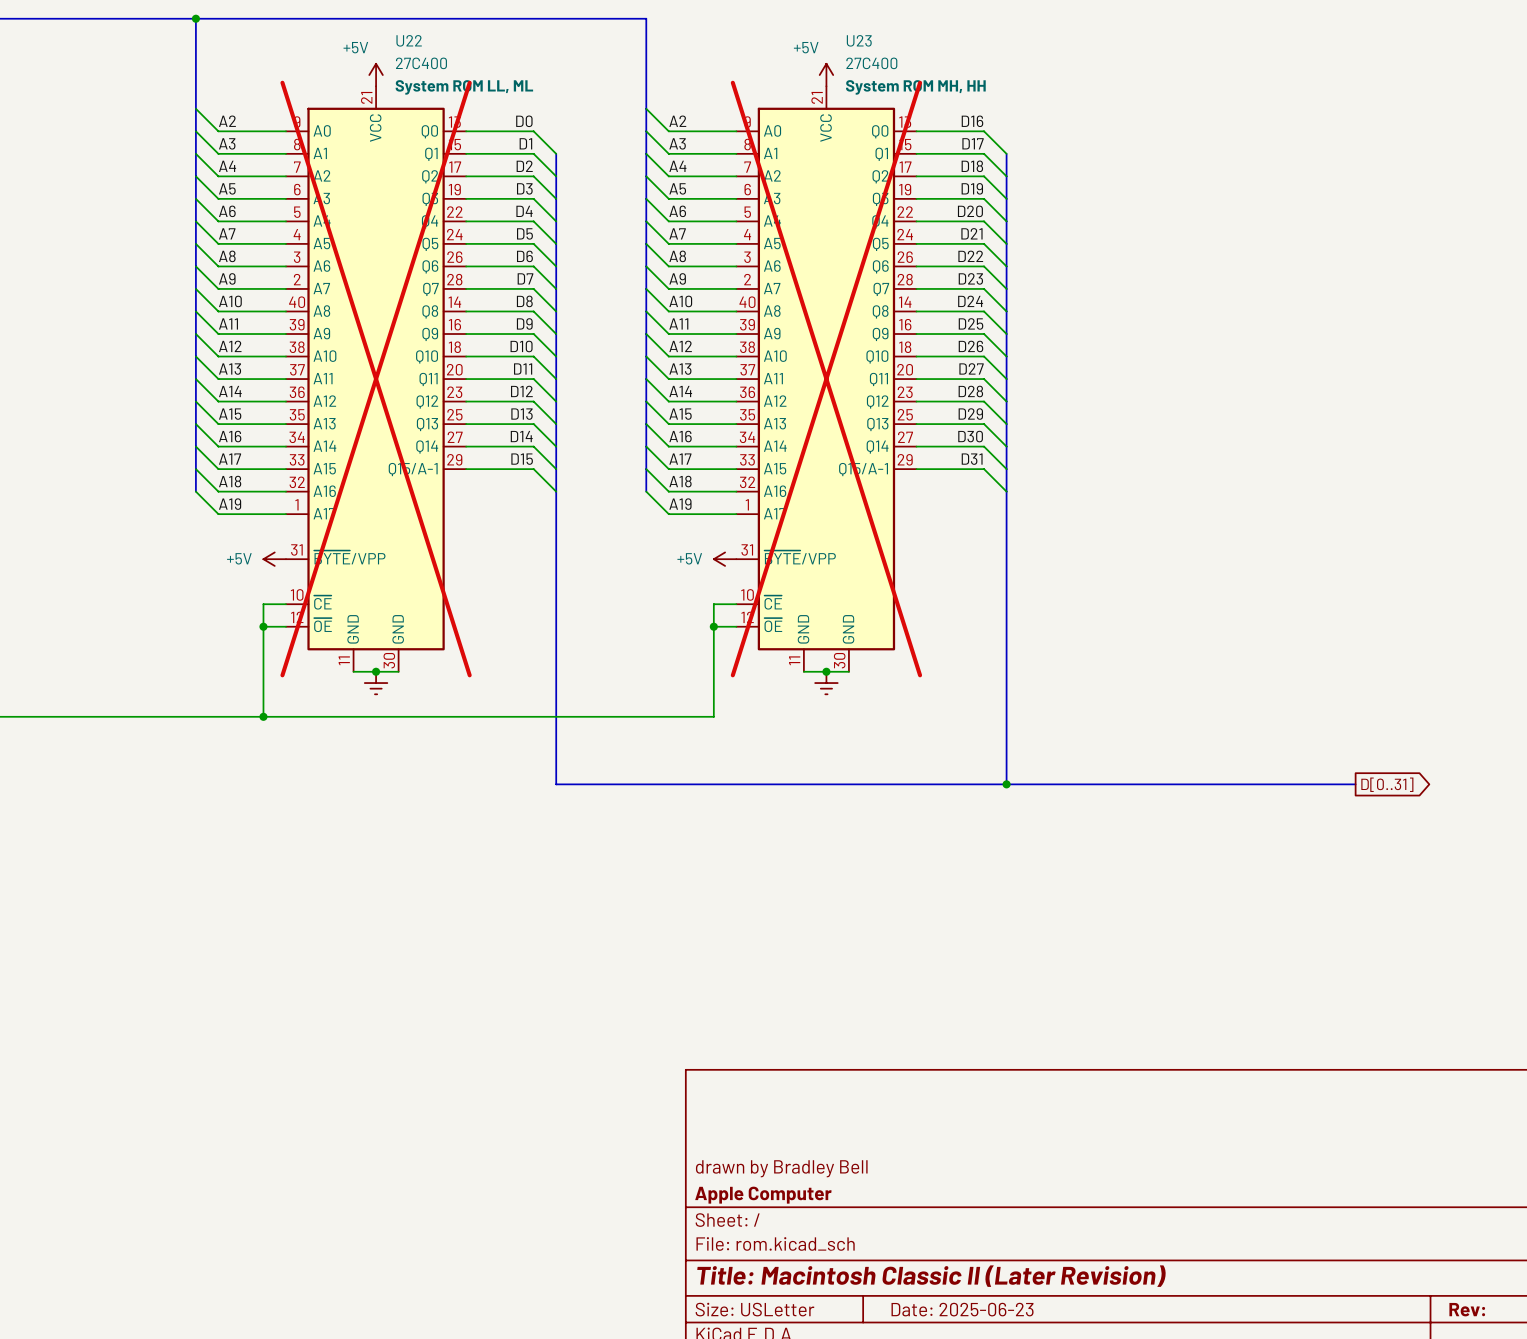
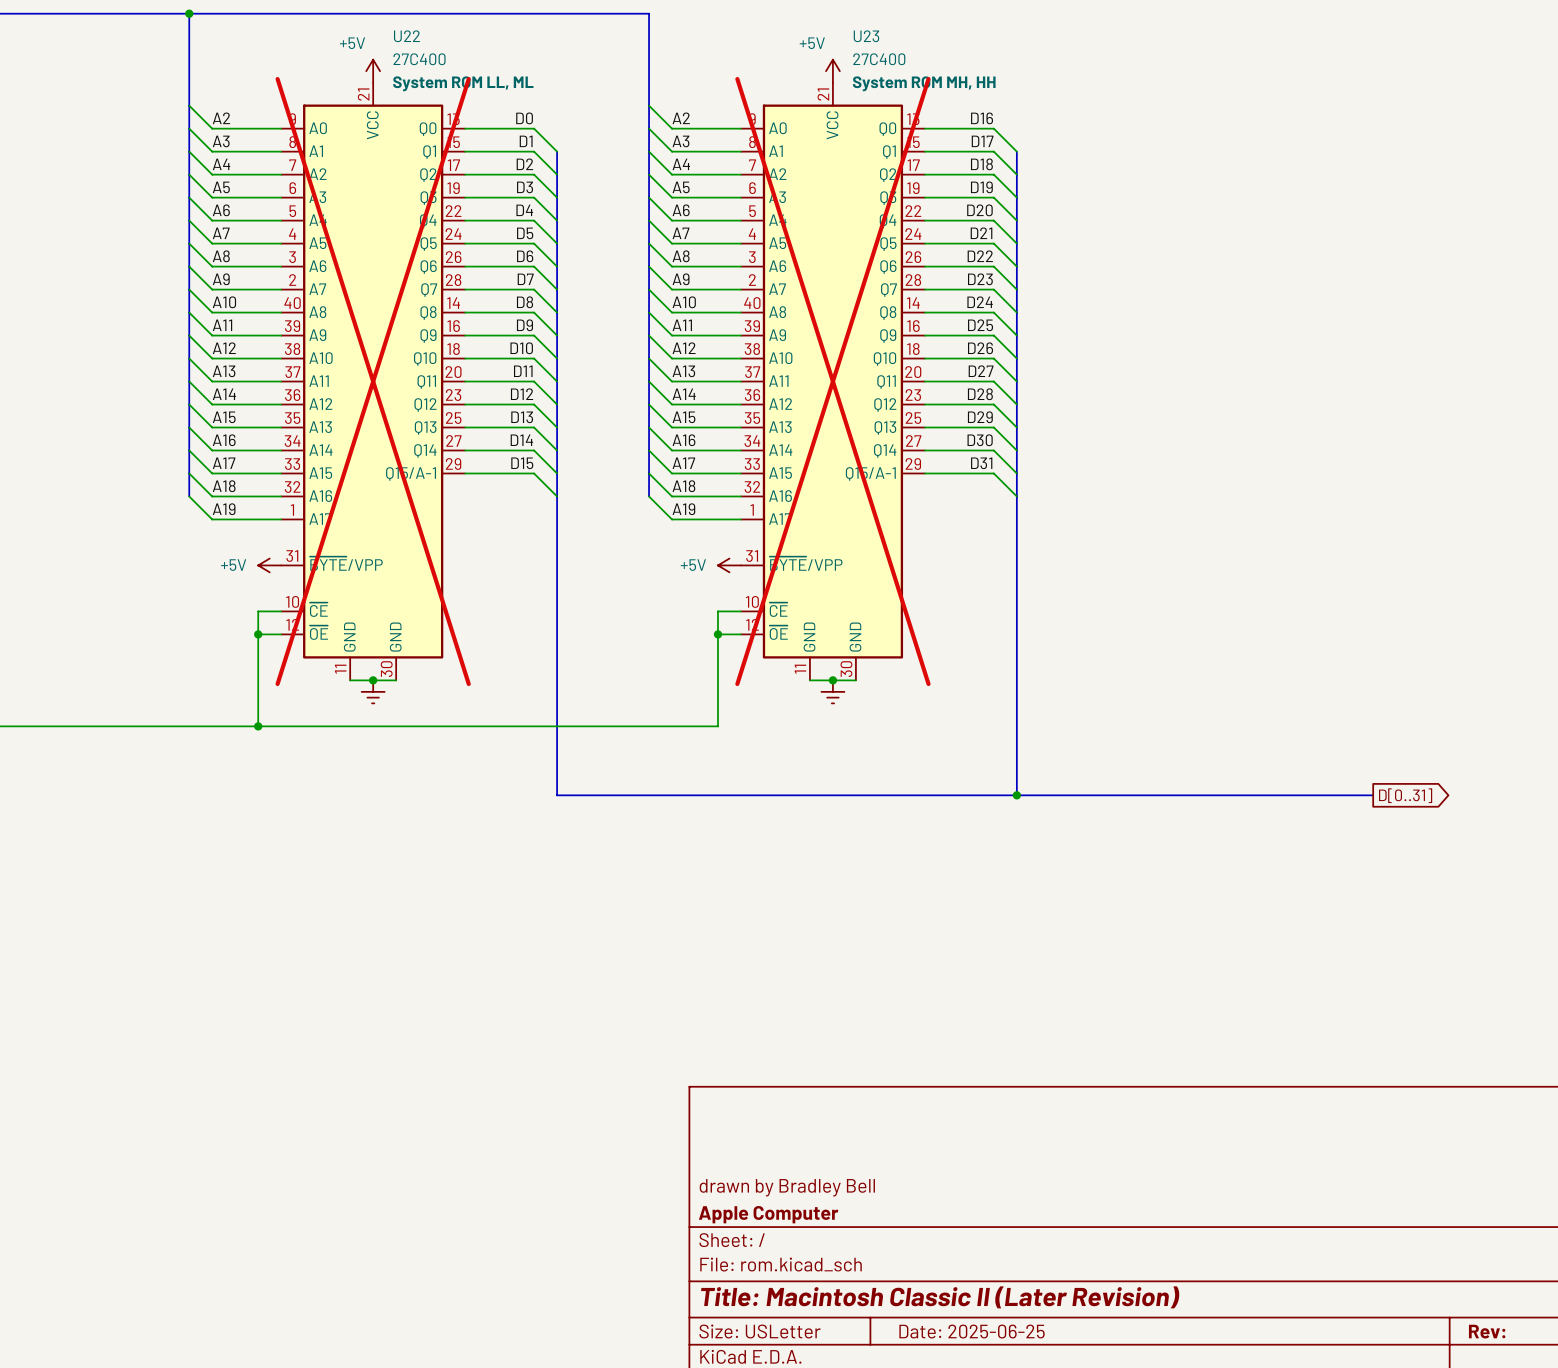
title block: Date: 2025-06-23 (962, 1309) -> Date: 2025-06-25 (972, 1331)

